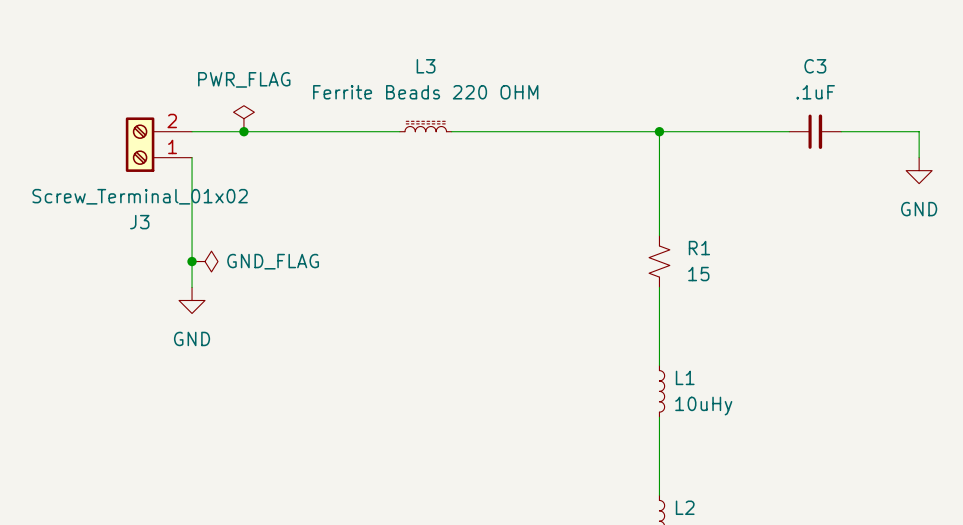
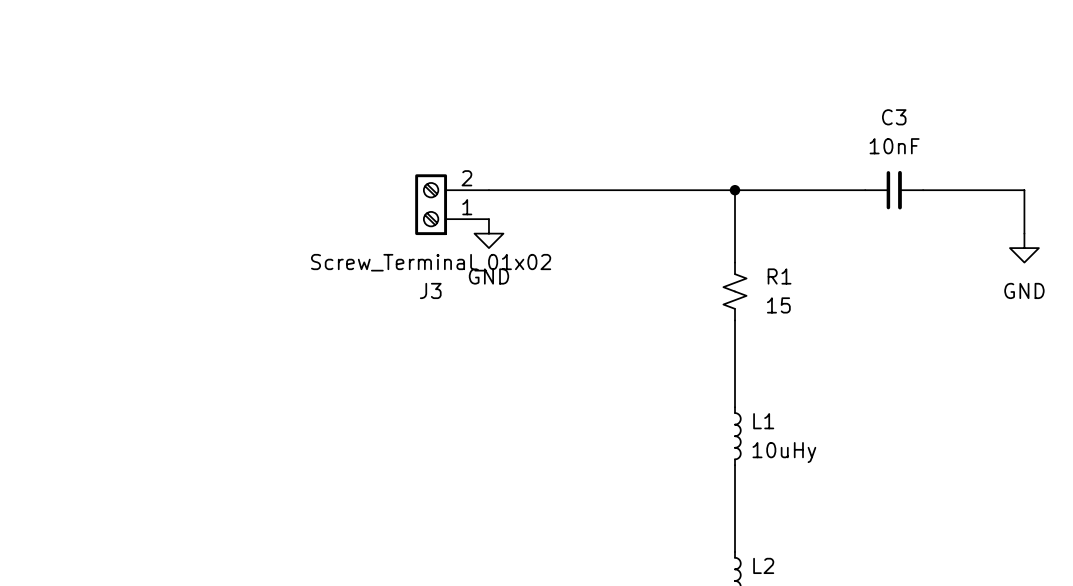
C3 value: .1uF (815, 92) -> 10nF (894, 146)
power symbol: PWR_FLAG (243, 118) -> none
L3: Ferrite Beads 220 OHM (425, 126) -> none
wire: (192, 131) (399, 131) -> none
junction: (243, 131) -> none
wire: (451, 131) (789, 131) -> (488, 190) (865, 190)
wire: (659, 131) (659, 170) -> none
junction position: (659, 131) -> (735, 190)
C3 position: (815, 131) -> (894, 190)
wire: (841, 131) (919, 131) (919, 157) -> none
J3 position: (158, 144) -> (452, 204)
wire: (192, 157) (192, 287) -> none
wire: none -> (923, 190) (1024, 190) (1024, 233)
power symbol position: GND (919, 170) -> GND (1024, 248)
power symbol: none -> GND (488, 233)
junction: (192, 261) -> none
power symbol: GND_FLAG (205, 261) -> none
power symbol: GND (192, 300) -> none

